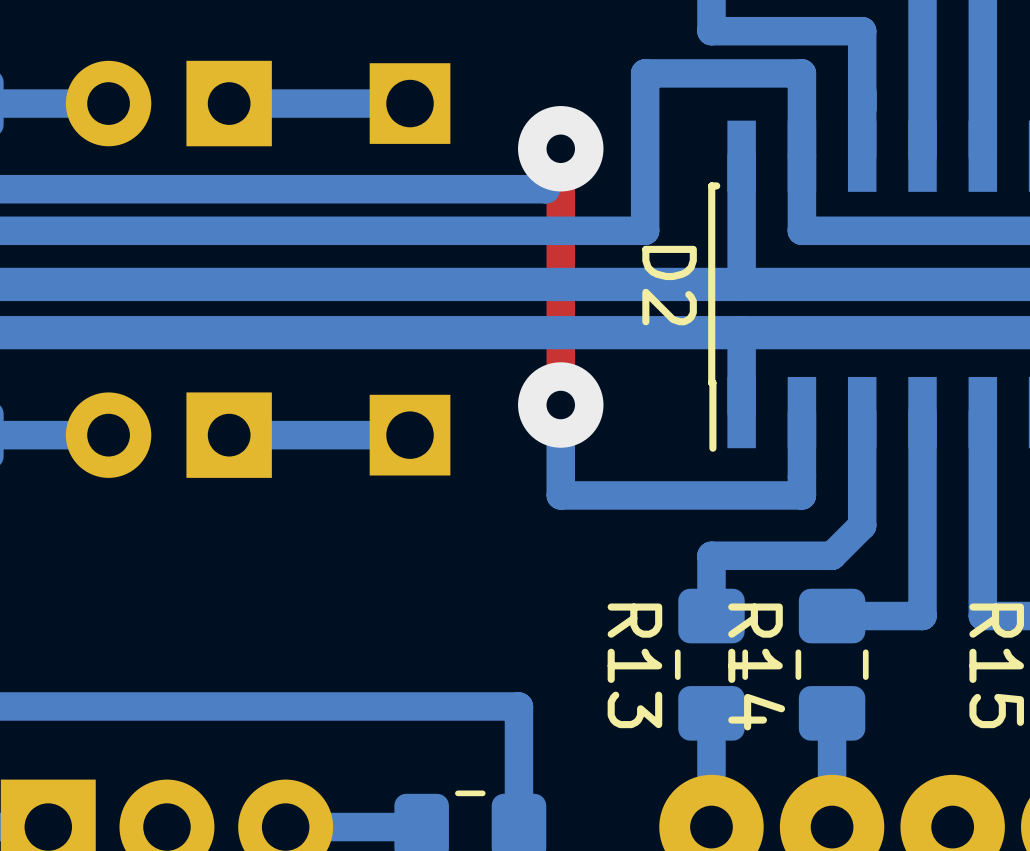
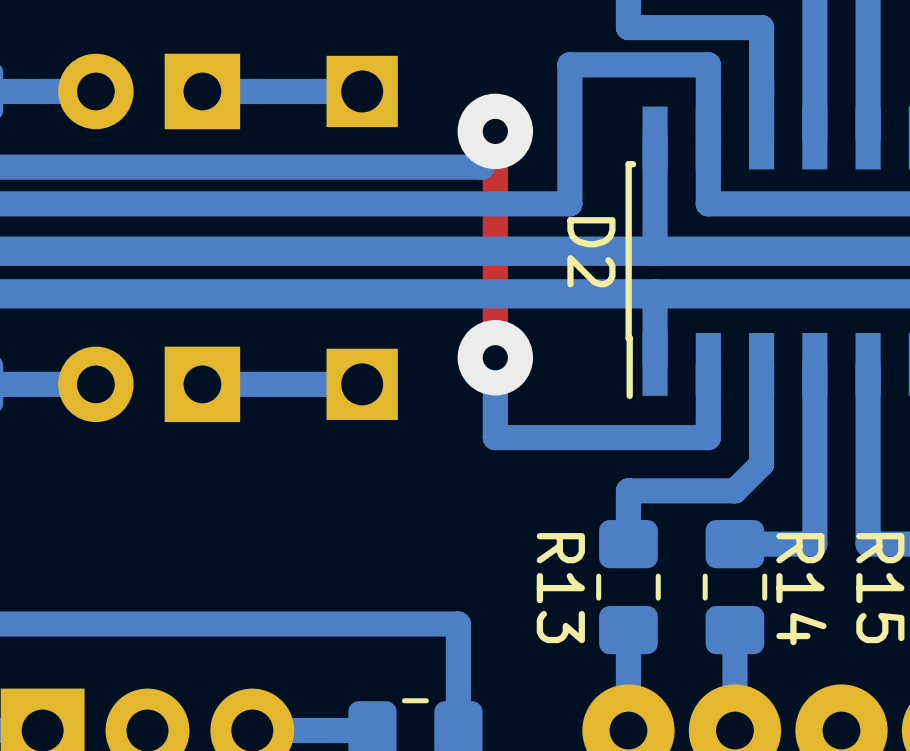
R14 name position: R14 (756, 666) -> R14 (801, 589)

